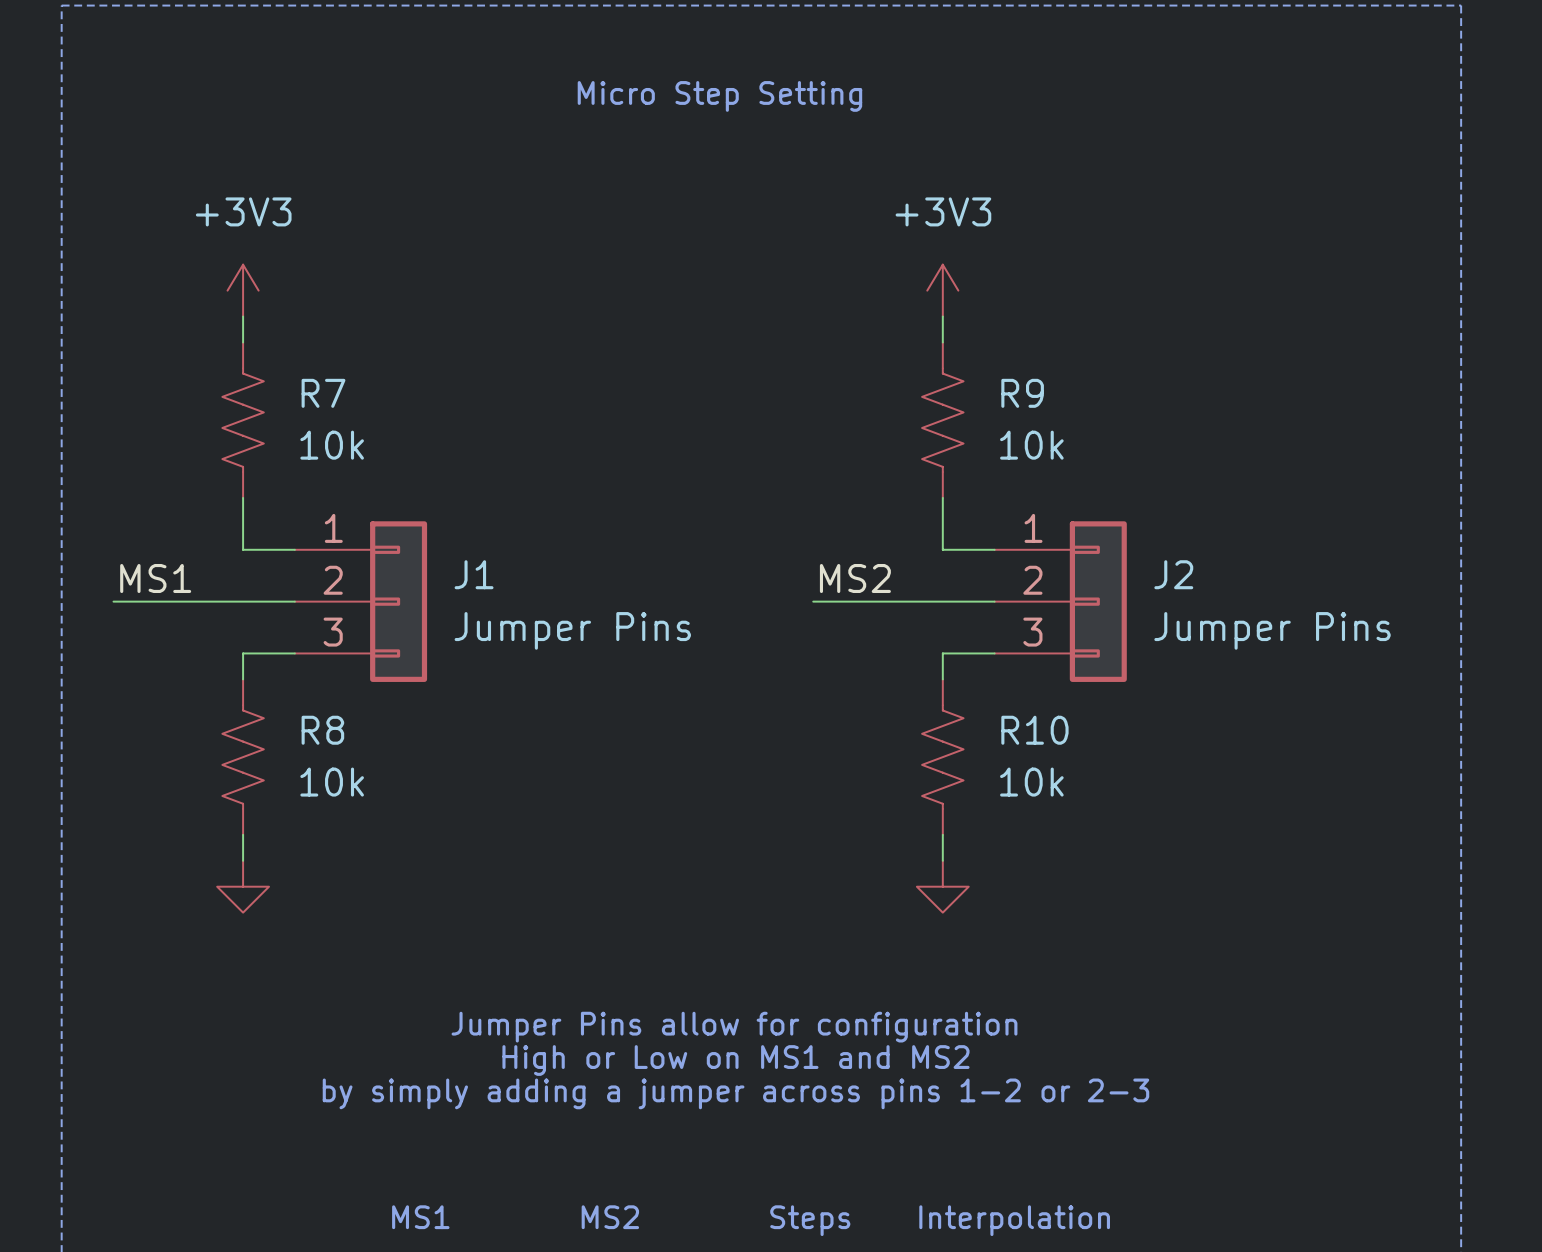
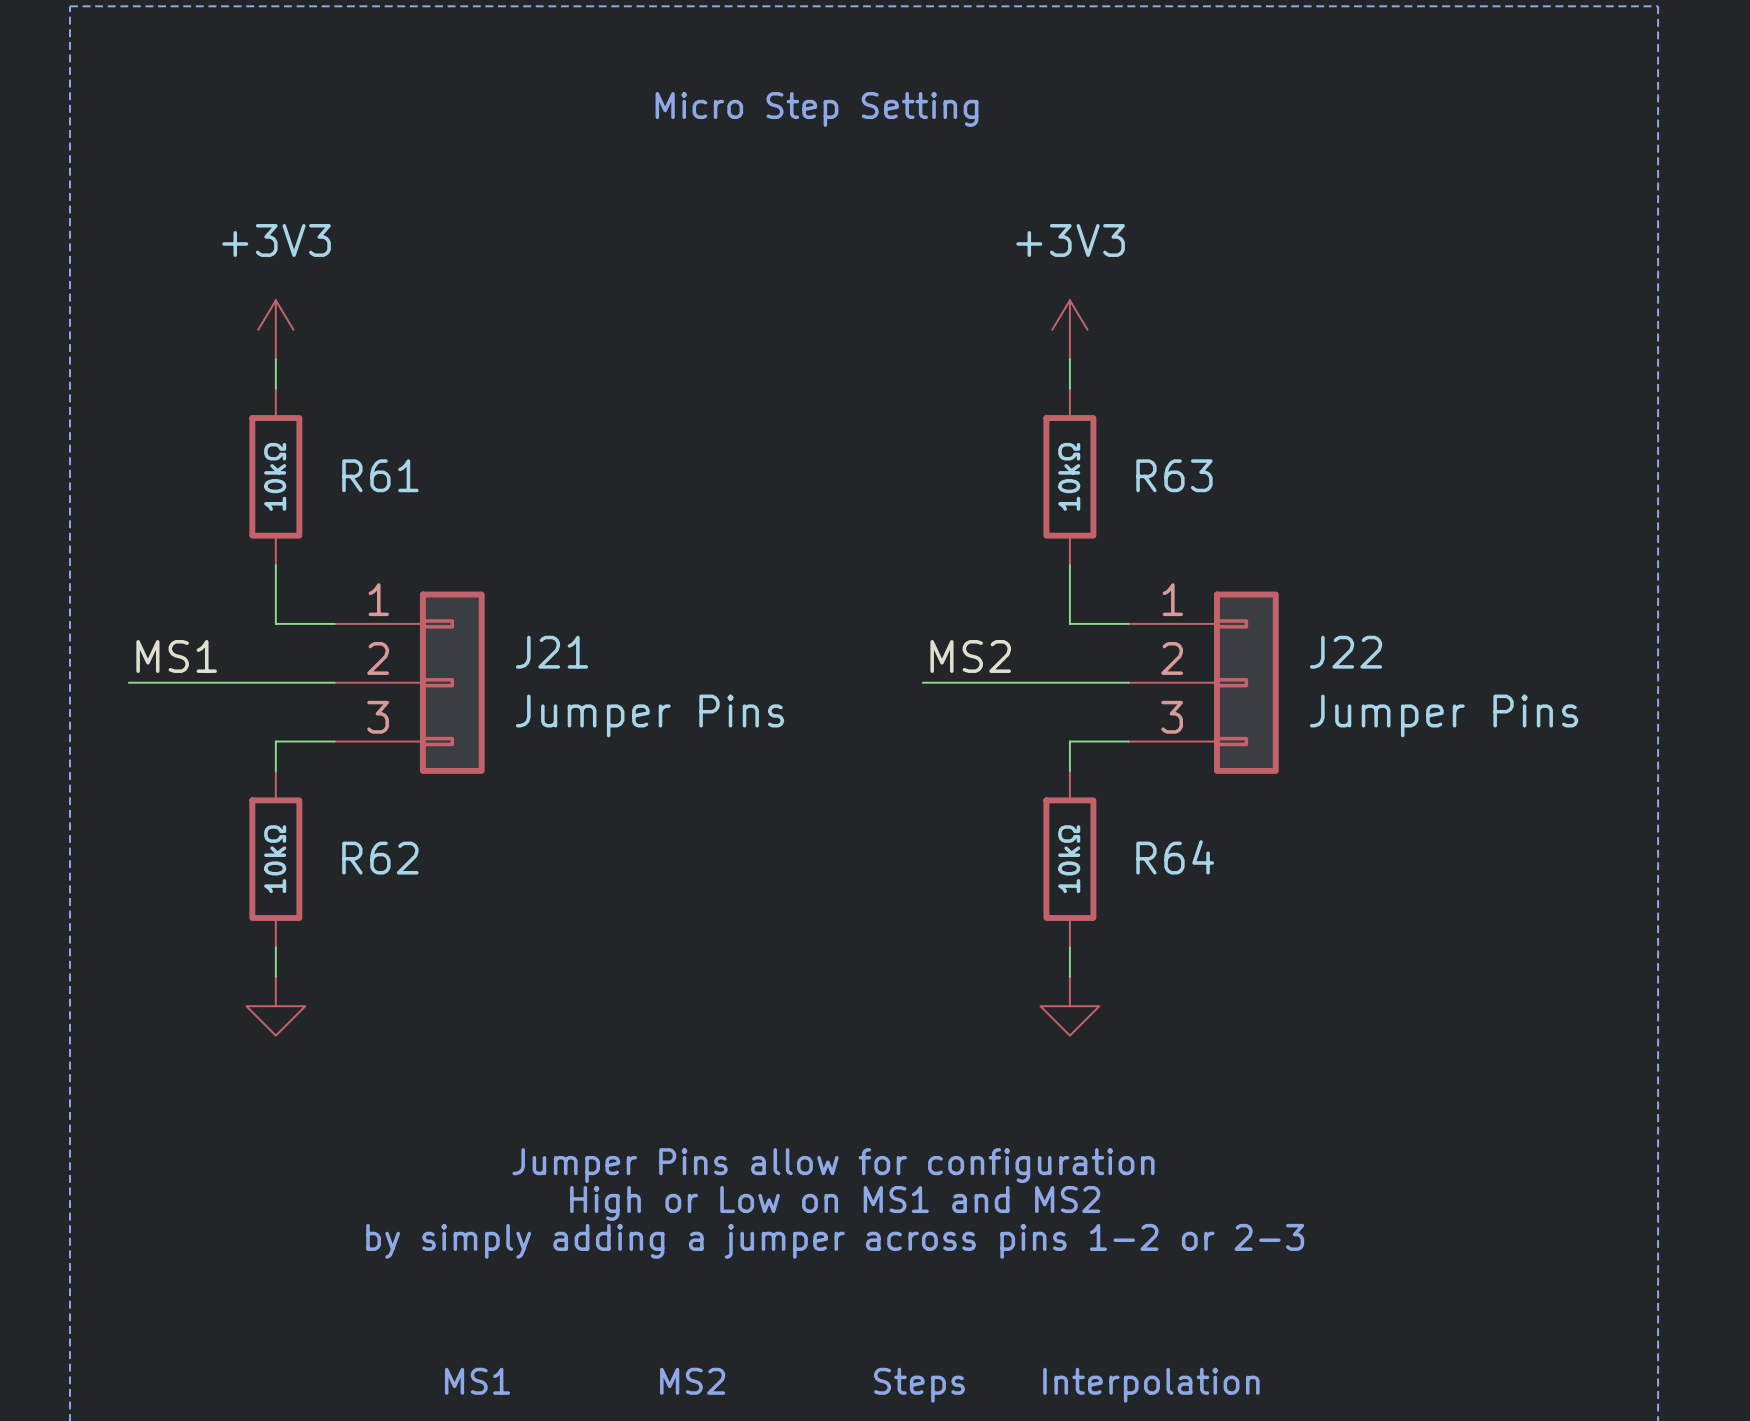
R7: 10k (243, 420) -> none
R61: none -> 10kΩ (275, 476)
R9: 10k (942, 420) -> none
R63: none -> 10kΩ (1069, 476)
J1 name: J1 (474, 574) -> J21 (551, 652)
J2 name: J2 (1173, 574) -> J22 (1346, 652)
R8: 10k (243, 757) -> none
R62: none -> 10kΩ (275, 859)
R10: 10k (942, 757) -> none
R64: none -> 10kΩ (1069, 859)

